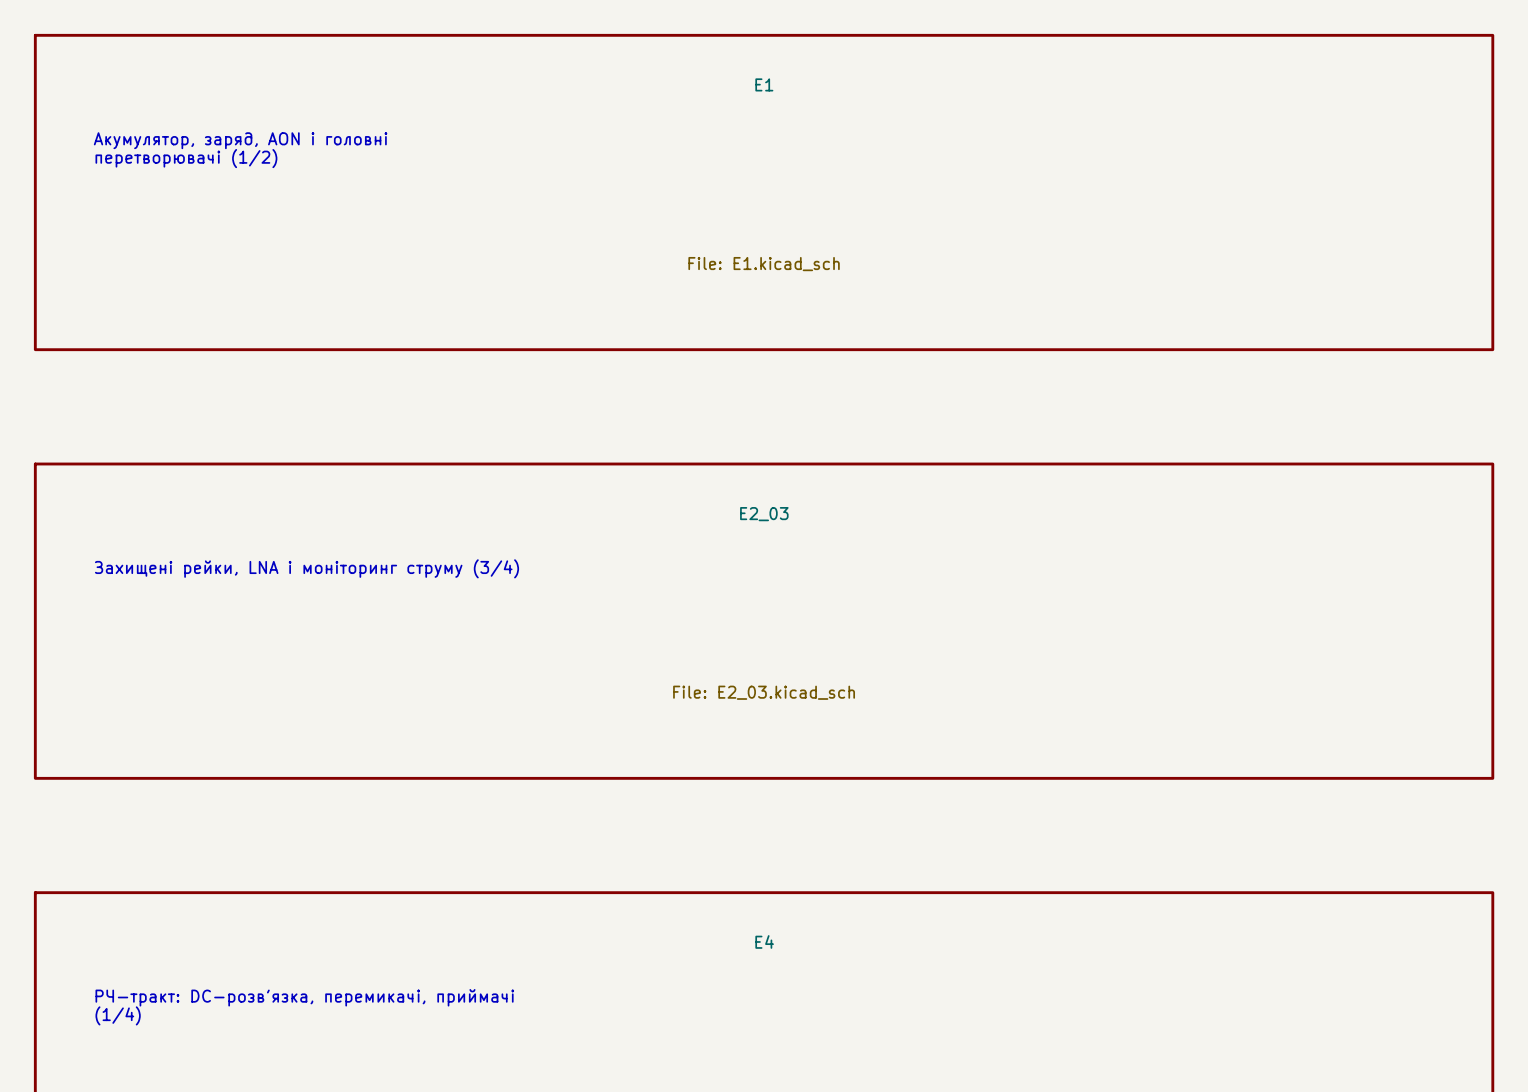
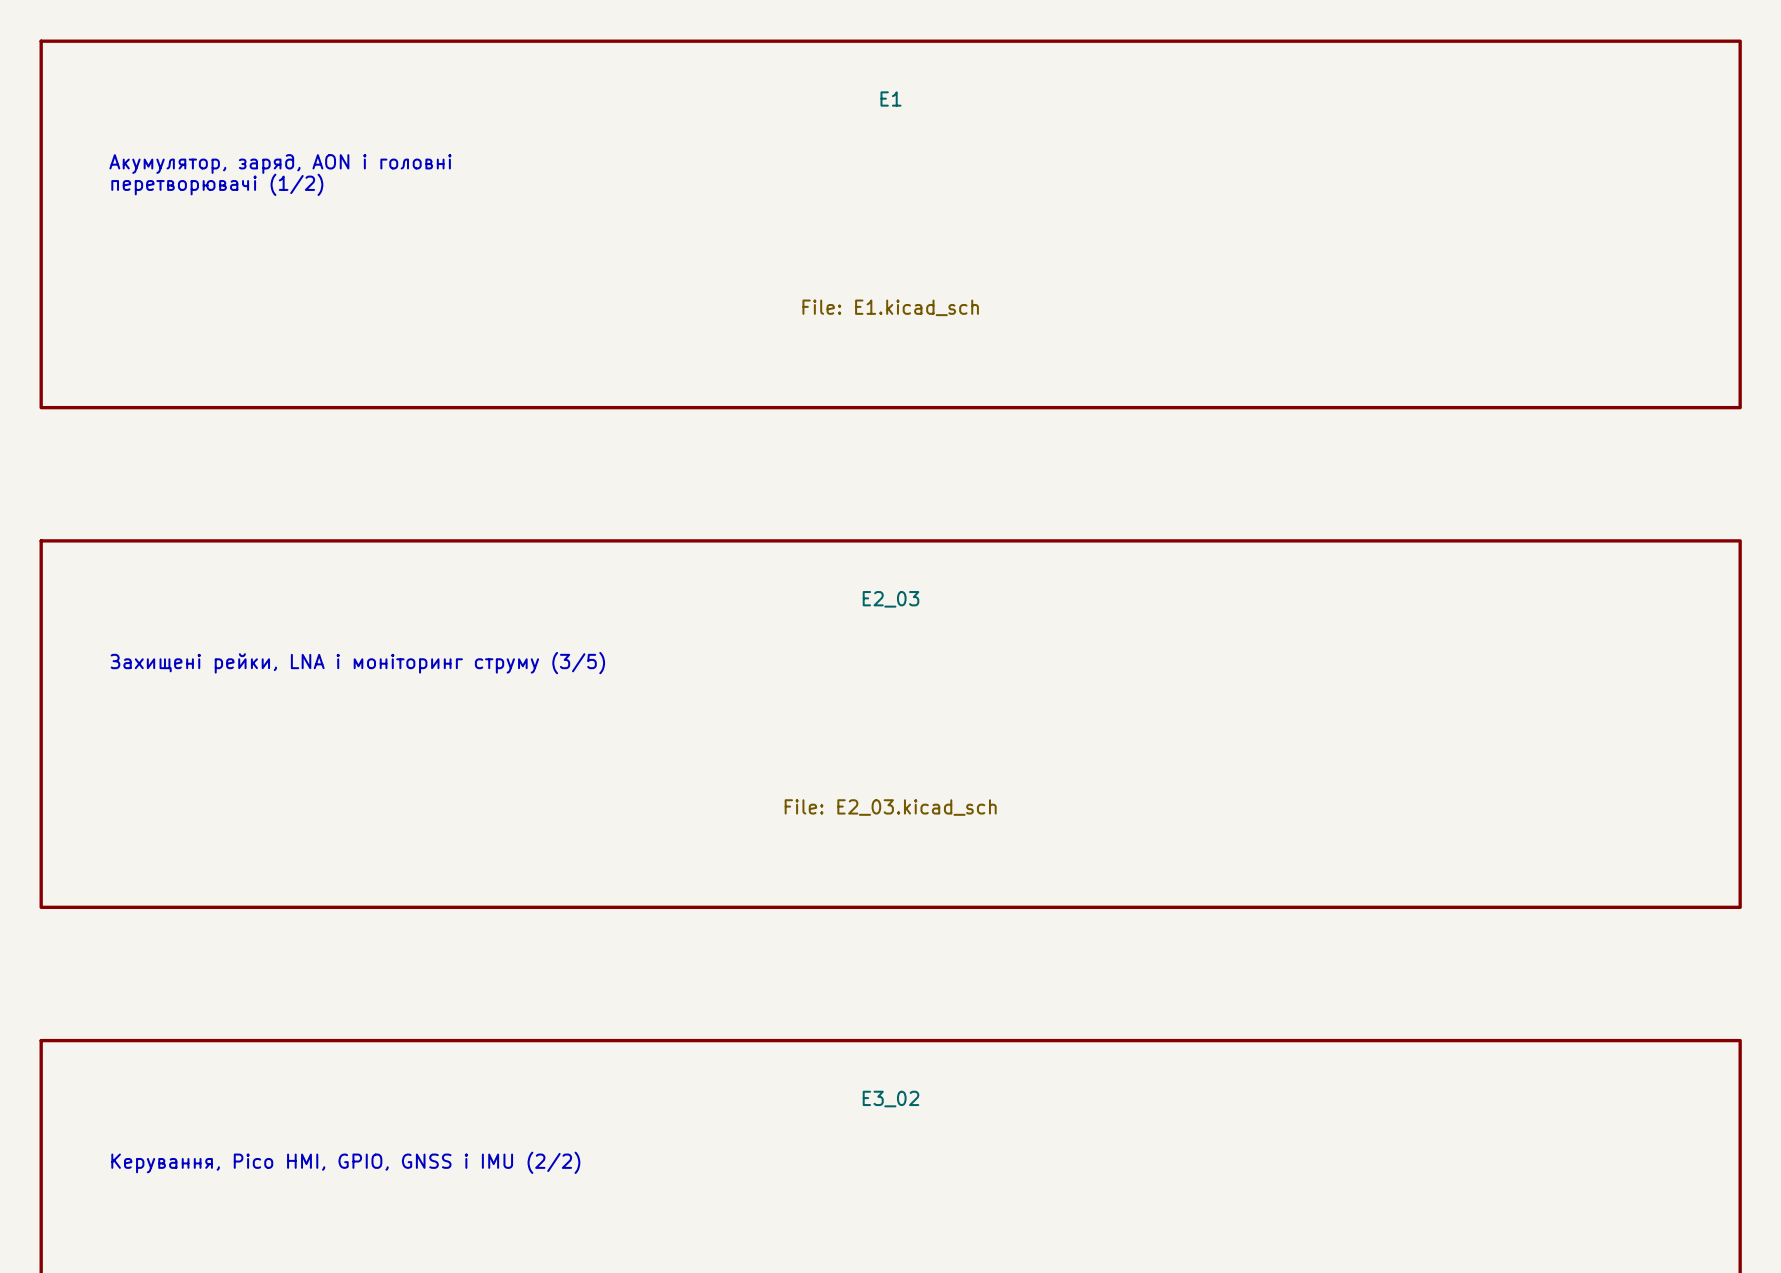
text: Захищені рейки, LNA і моніторинг струму (3/4) (307, 568) -> Захищені рейки, LNA і моніторинг струму (3/5) (357, 663)
sheet E4 name: E4 (764, 941) -> E3_02 (891, 1099)
text: РЧ-тракт: DC-розв'язка, перемикачі, приймачі (304, 997) -> Керування, Pico HMI, GPIO, GNSS і IMU (2/2) (345, 1162)
text: (1/4) (118, 1015) -> none

